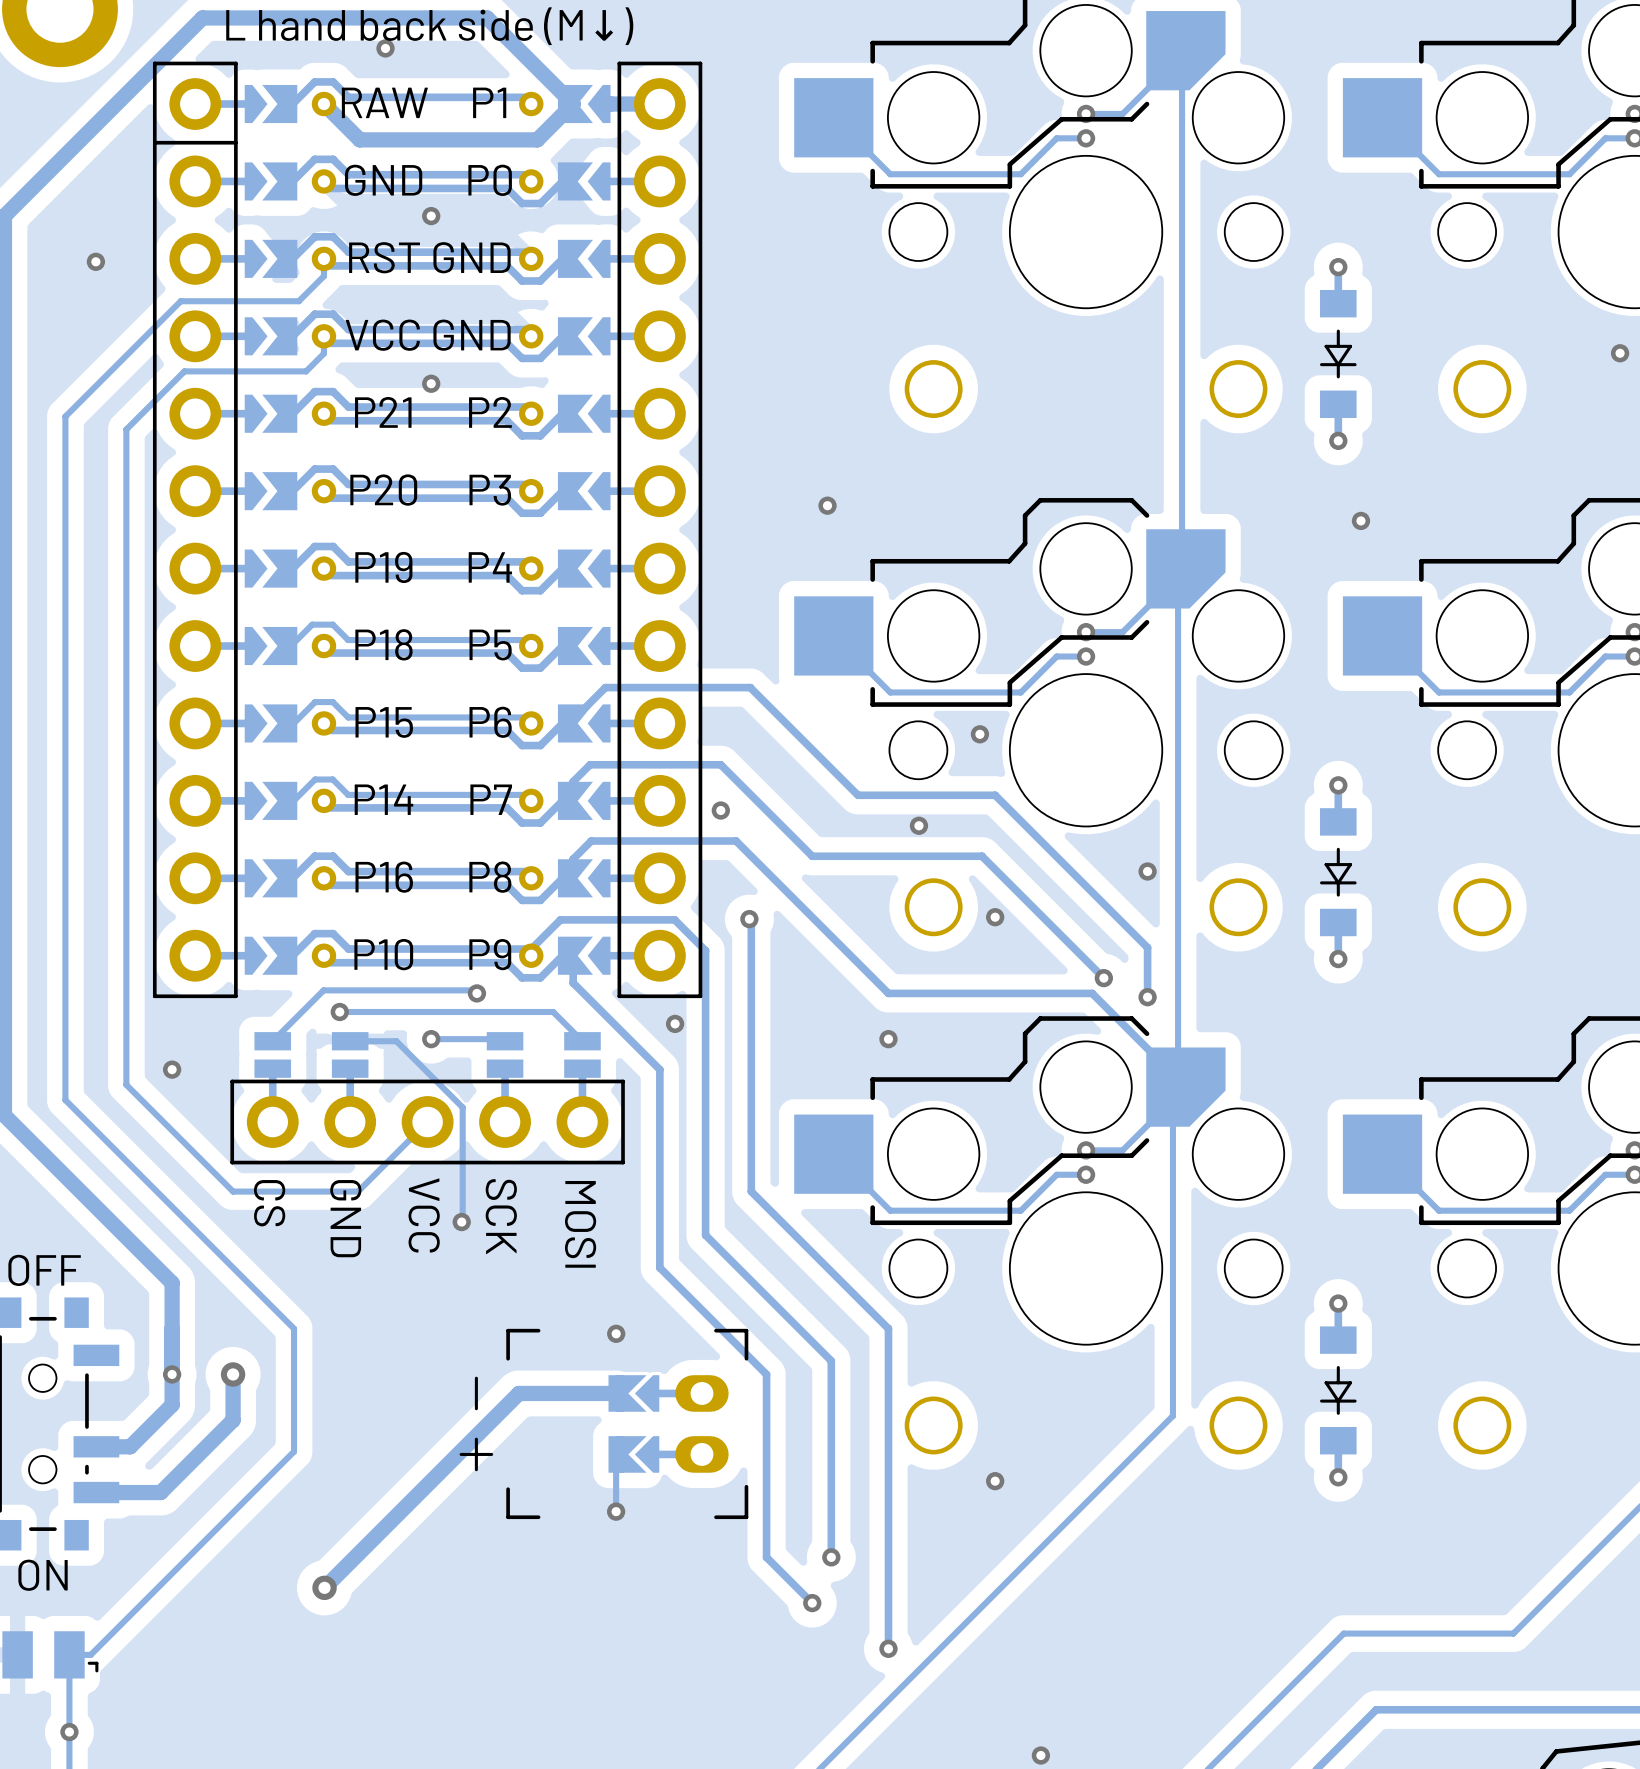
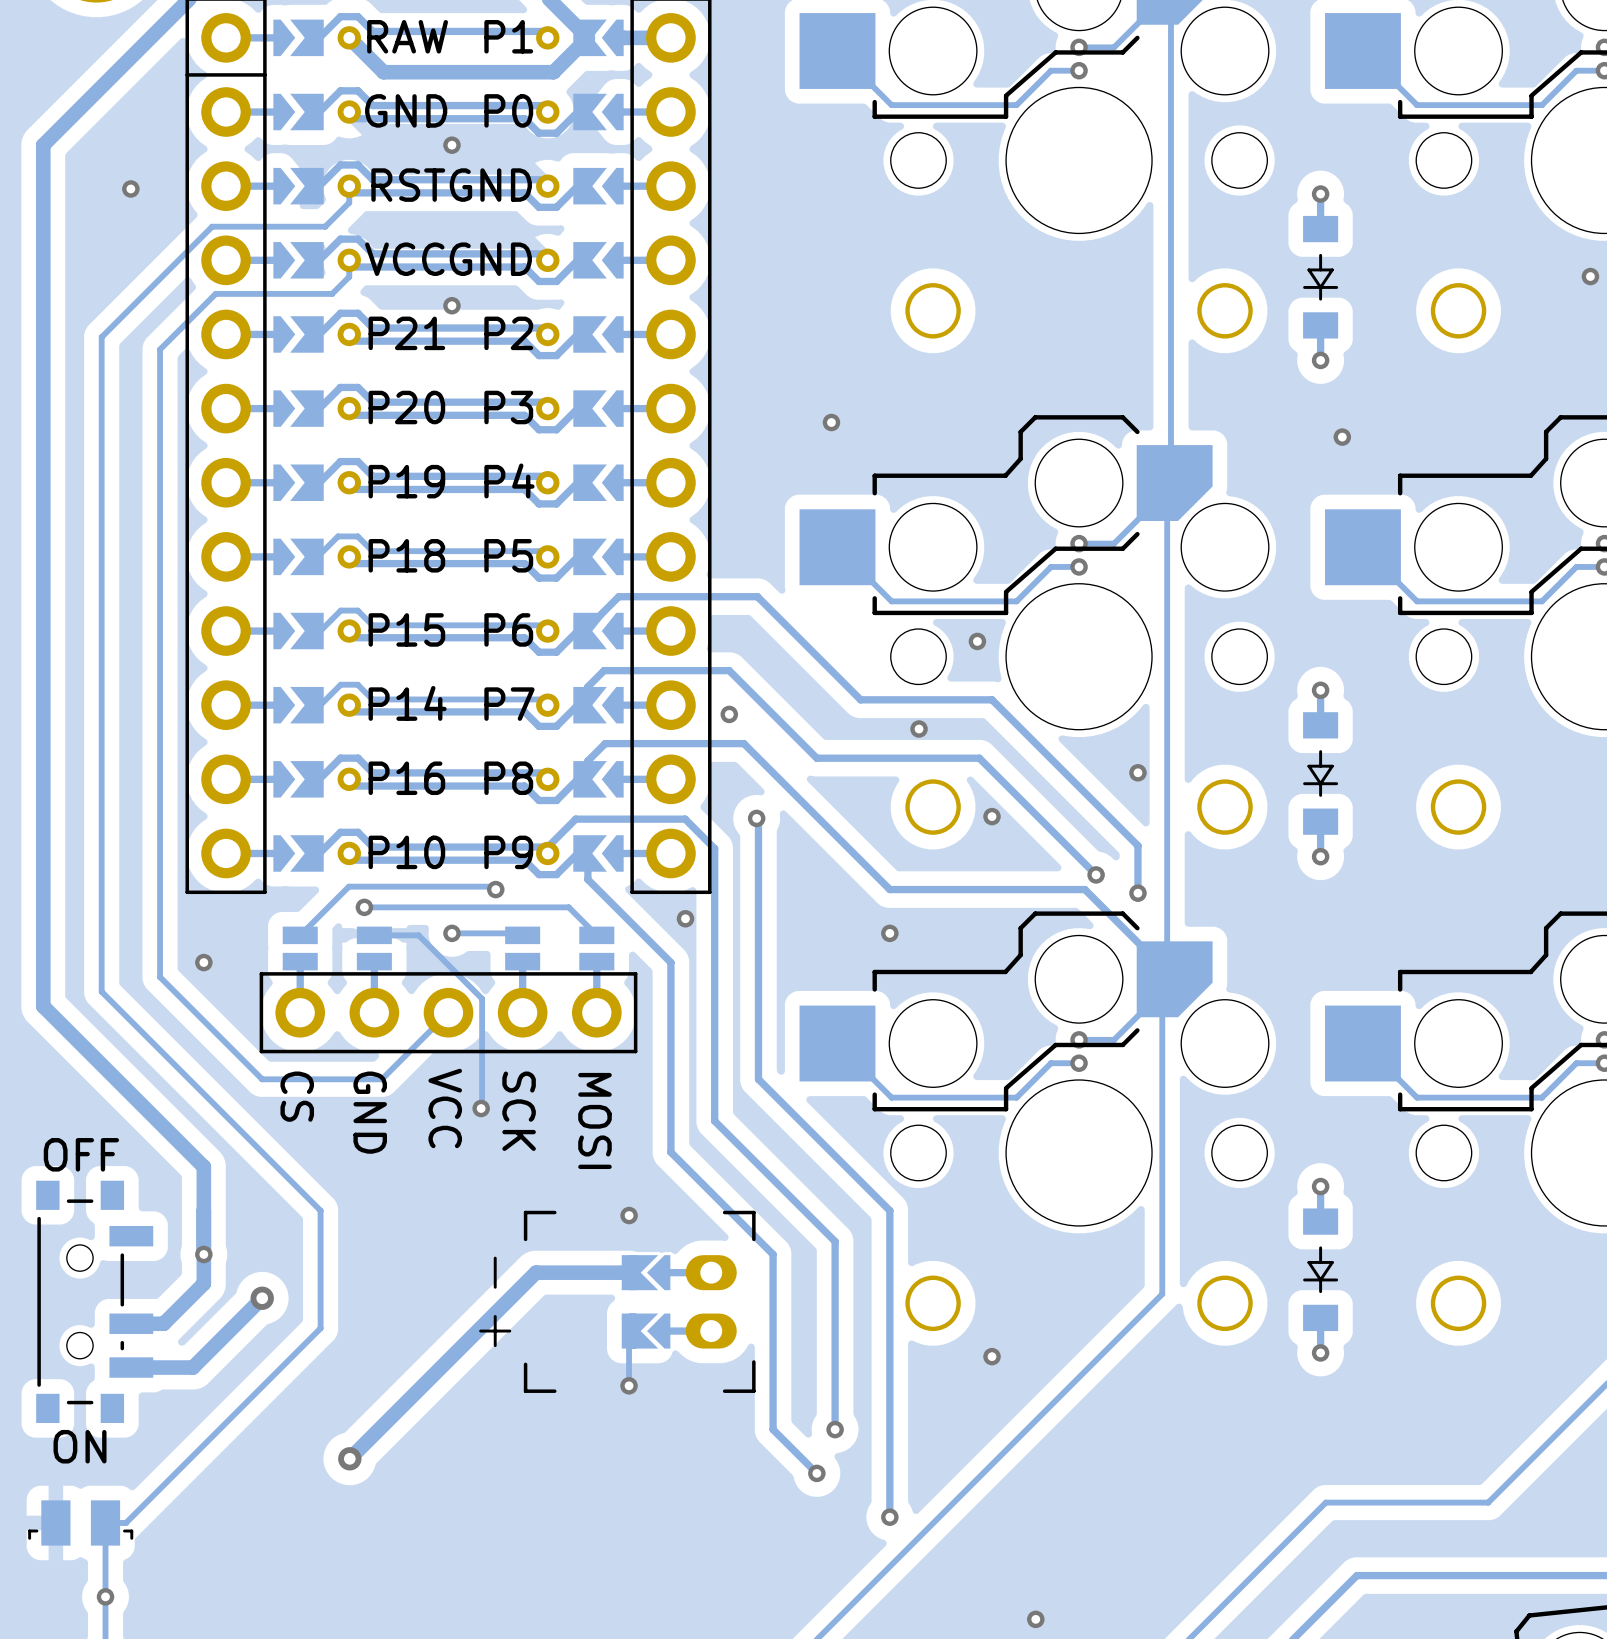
track: (233, 1374) (233, 1420) -> none
via position: (233, 1374) -> (262, 1298)

